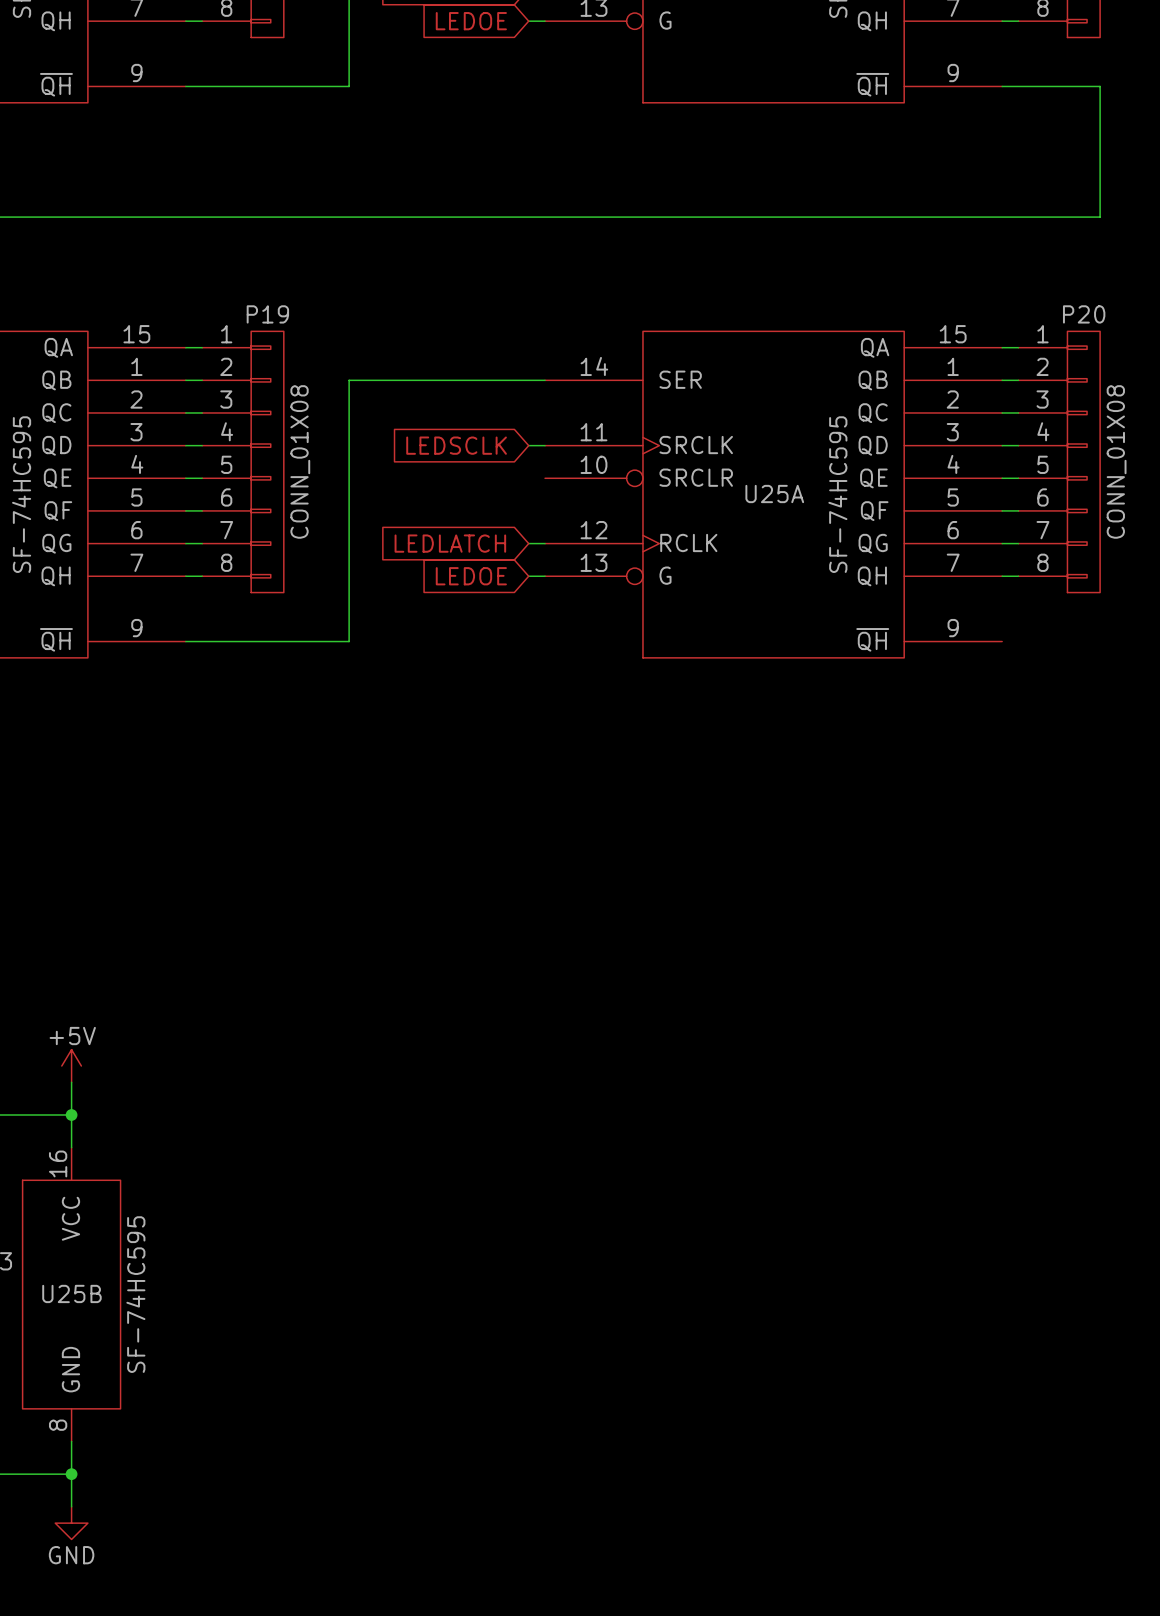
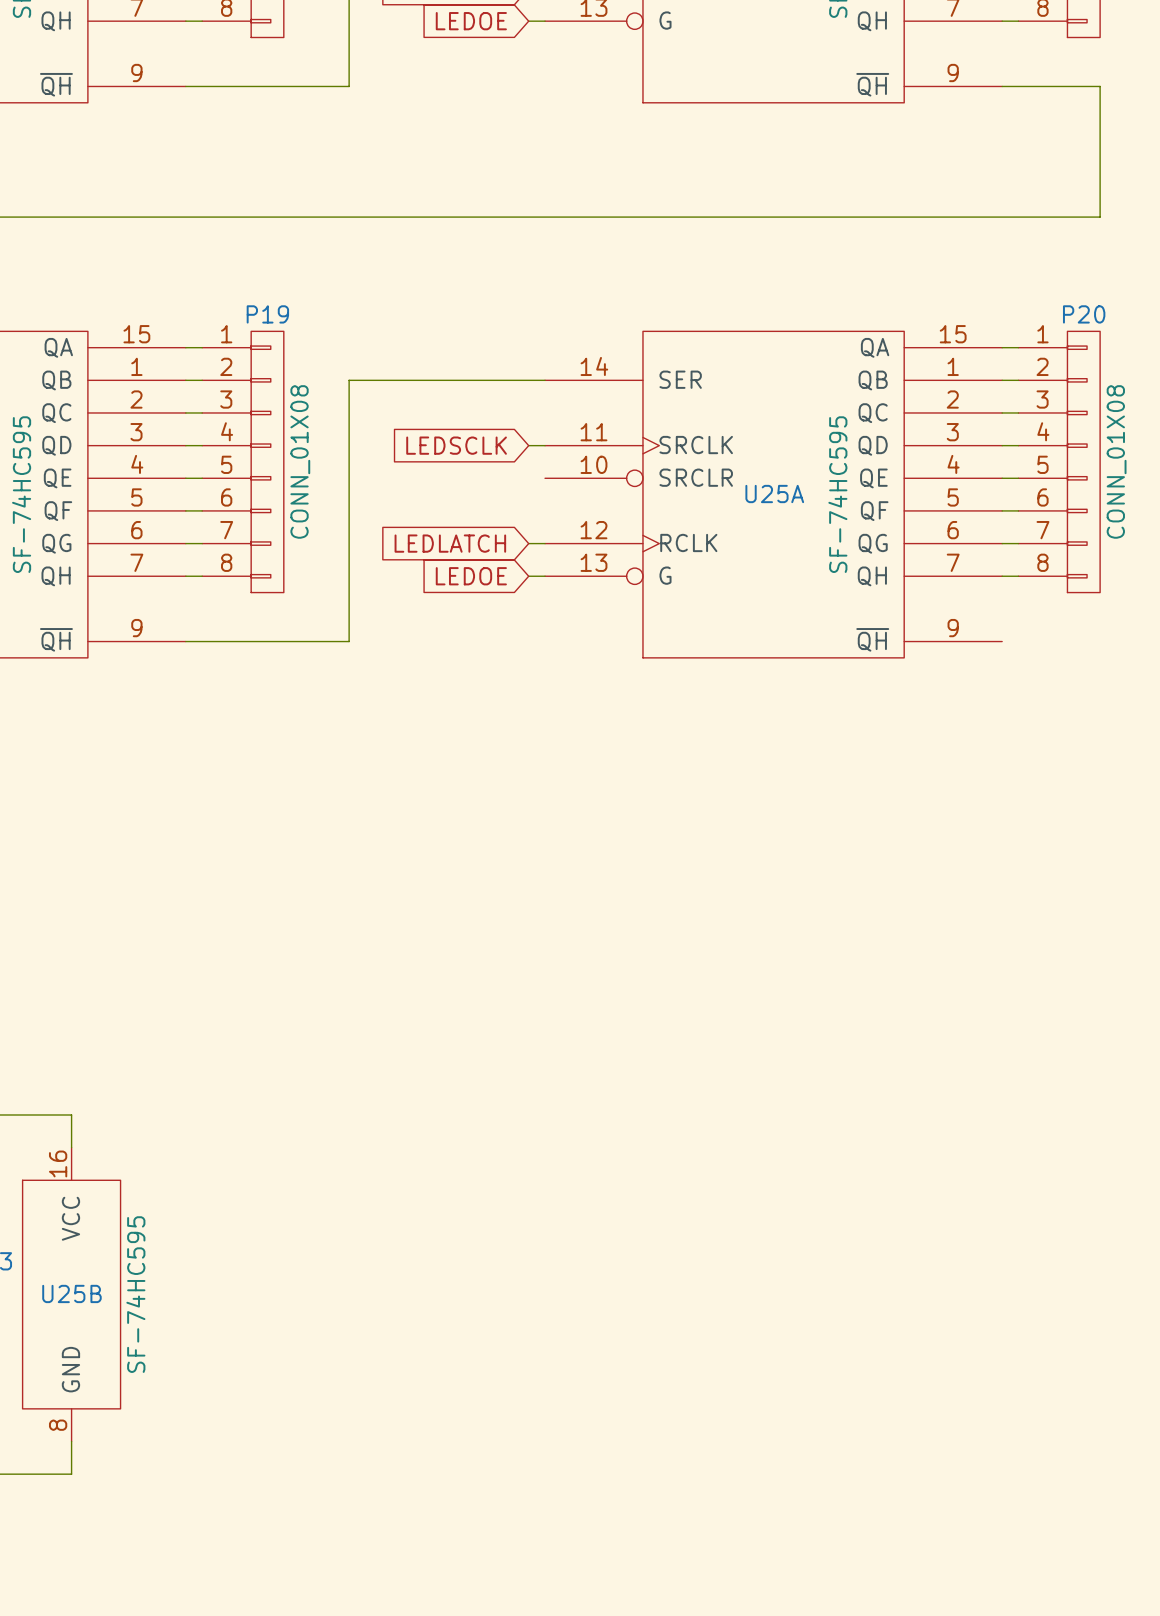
power symbol: +5V (71, 1066) -> none
wire: (71, 1082) (71, 1114) -> none
junction: (71, 1114) -> none
wire: (71, 1474) (71, 1506) -> none
junction: (71, 1474) -> none
power symbol: GND (71, 1523) -> none

